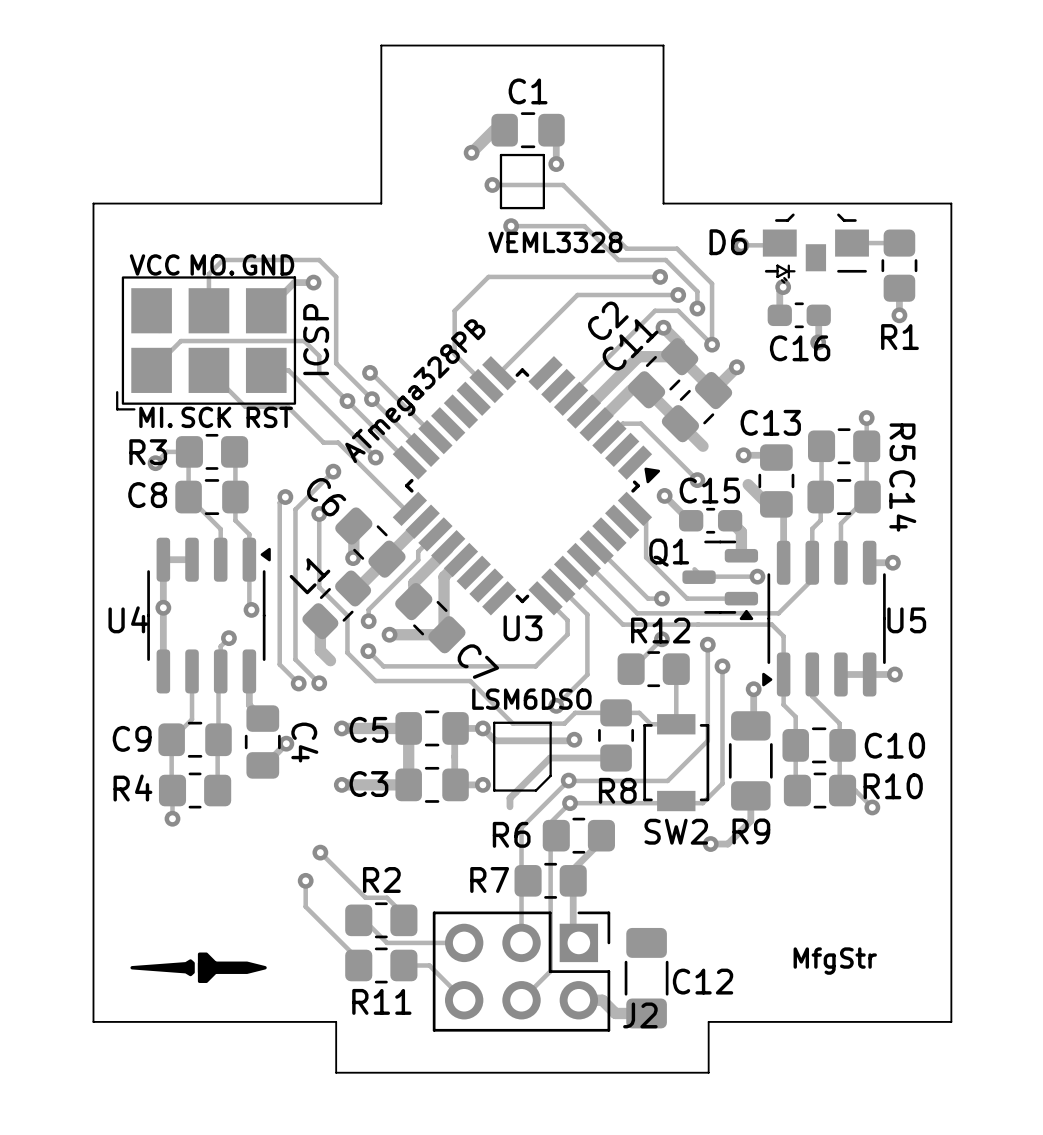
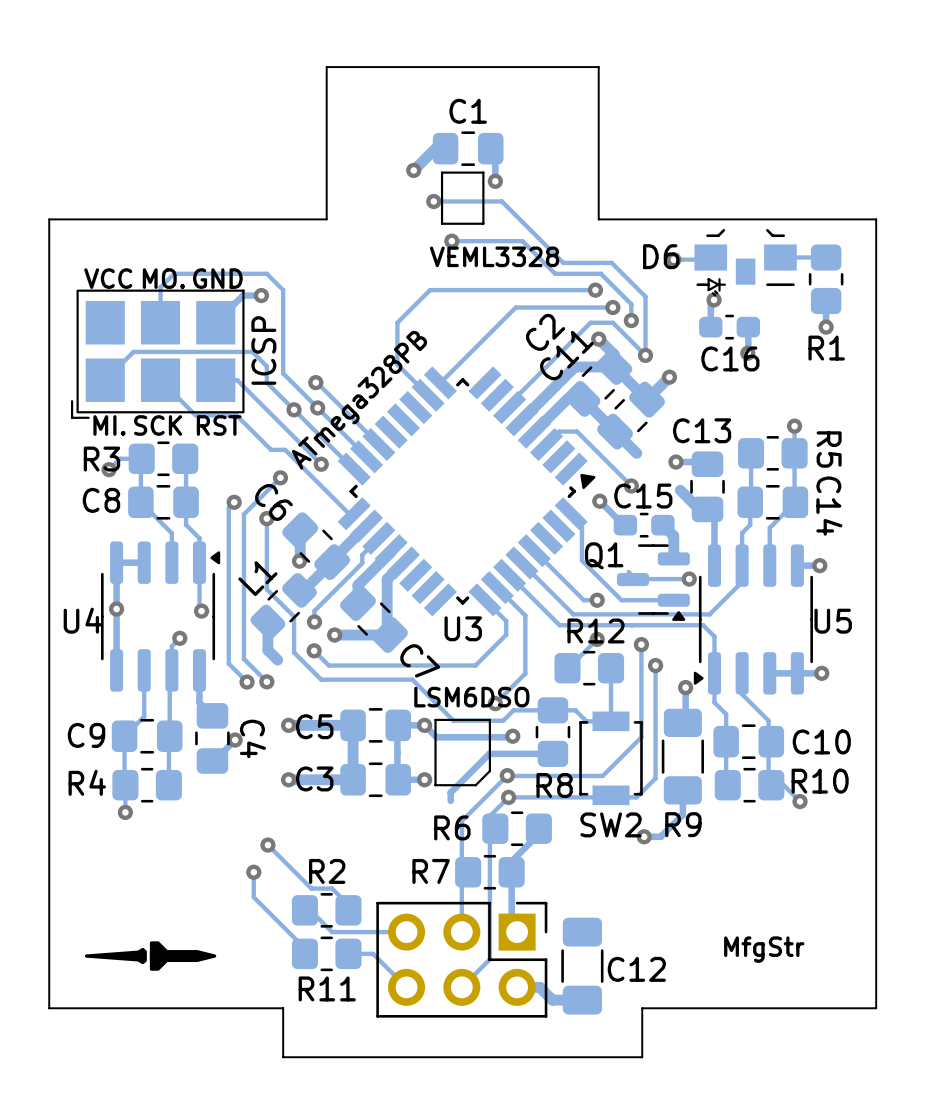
J2 name: J2 (640, 1015) -> none

